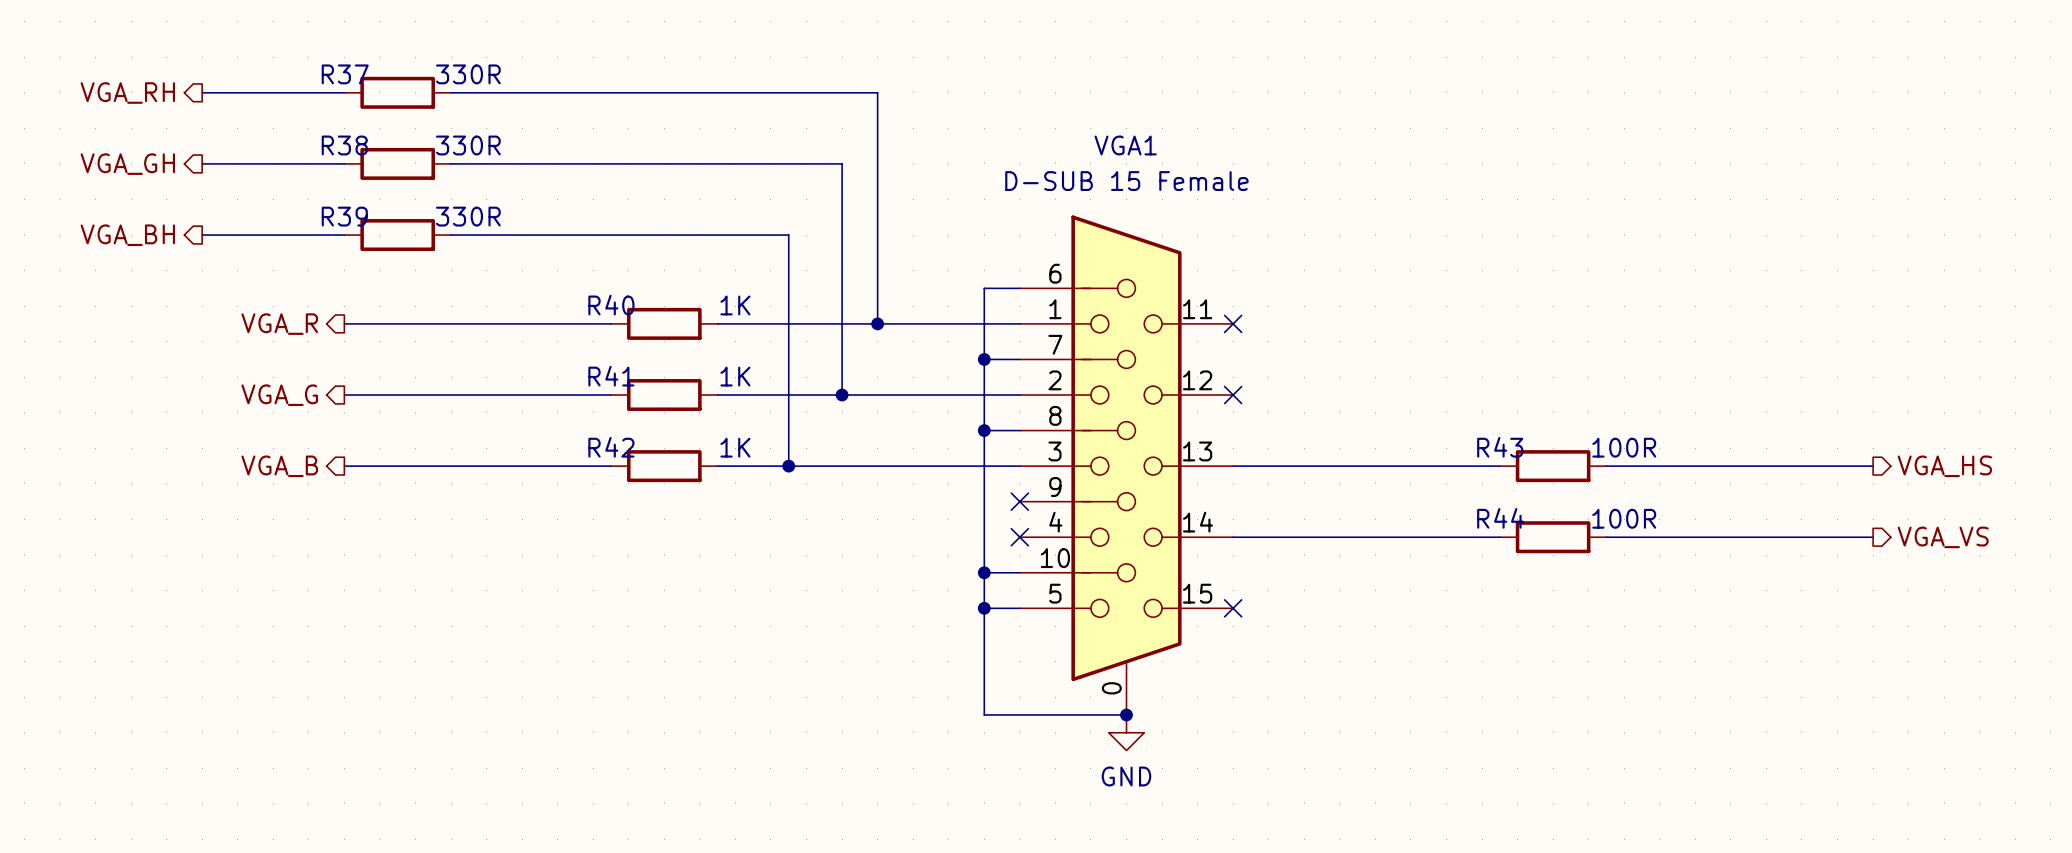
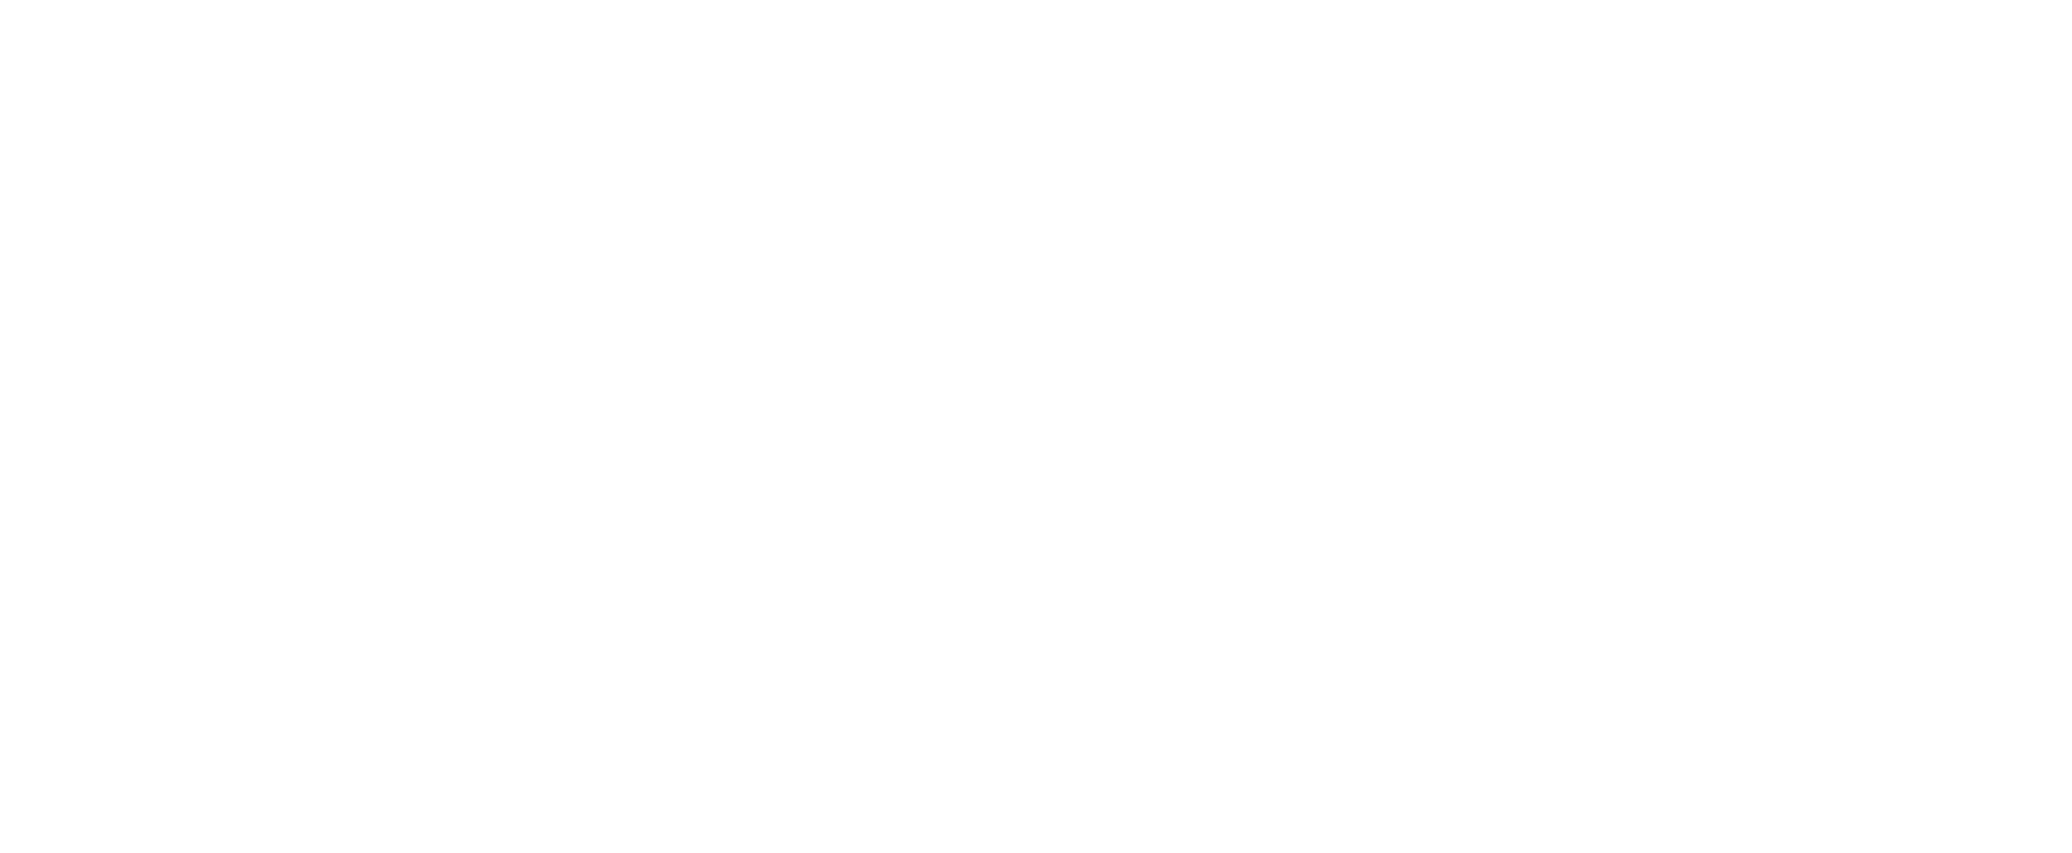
wire: (202, 92) (344, 92) -> none
R37: 330R (397, 92) -> none
wire: (451, 92) (877, 92) (877, 323) -> none
hierarchical label: VGA_RH (127, 93) -> none
wire: (202, 163) (344, 163) -> none
R38: 330R (397, 163) -> none
wire: (451, 163) (842, 163) (842, 395) -> none
hierarchical label: VGA_GH (127, 164) -> none
hierarchical label: VGA_BH (127, 235) -> none
wire: (202, 235) (344, 235) -> none
R39: 330R (397, 235) -> none
wire: (451, 235) (788, 235) (788, 466) -> none
wire: (1019, 288) (984, 288) (984, 714) (1126, 714) -> none
wire: (344, 323) (610, 323) -> none
R40: 1K (664, 323) -> none
wire: (717, 323) (1019, 323) -> none
junction: (877, 323) -> none
no-connect mark: (1233, 323) -> none
hierarchical label: VGA_R (279, 324) -> none
wire: (984, 359) (1019, 359) -> none
junction: (984, 359) -> none
hierarchical label: VGA_G (279, 395) -> none
wire: (344, 395) (610, 395) -> none
R41: 1K (664, 395) -> none
wire: (717, 395) (1019, 395) -> none
junction: (842, 395) -> none
no-connect mark: (1233, 395) -> none
wire: (984, 430) (1019, 430) -> none
junction: (984, 430) -> none
VGA1: D-SUB 15 Female (1126, 465) -> none
hierarchical label: VGA_B (279, 466) -> none
wire: (344, 466) (610, 466) -> none
R42: 1K (664, 466) -> none
wire: (717, 466) (1019, 466) -> none
junction: (788, 466) -> none
wire: (1233, 466) (1499, 466) -> none
R43: 100R (1553, 466) -> none
wire: (1606, 466) (1873, 466) -> none
hierarchical label: VGA_HS (1944, 466) -> none
no-connect mark: (1019, 501) -> none
no-connect mark: (1019, 537) -> none
wire: (1233, 537) (1499, 537) -> none
R44: 100R (1553, 537) -> none
wire: (1606, 537) (1873, 537) -> none
hierarchical label: VGA_VS (1943, 537) -> none
wire: (984, 572) (1019, 572) -> none
junction: (984, 572) -> none
wire: (984, 608) (1019, 608) -> none
junction: (984, 608) -> none
no-connect mark: (1233, 608) -> none
junction: (1126, 714) -> none
power symbol: GND (1126, 732) -> none

